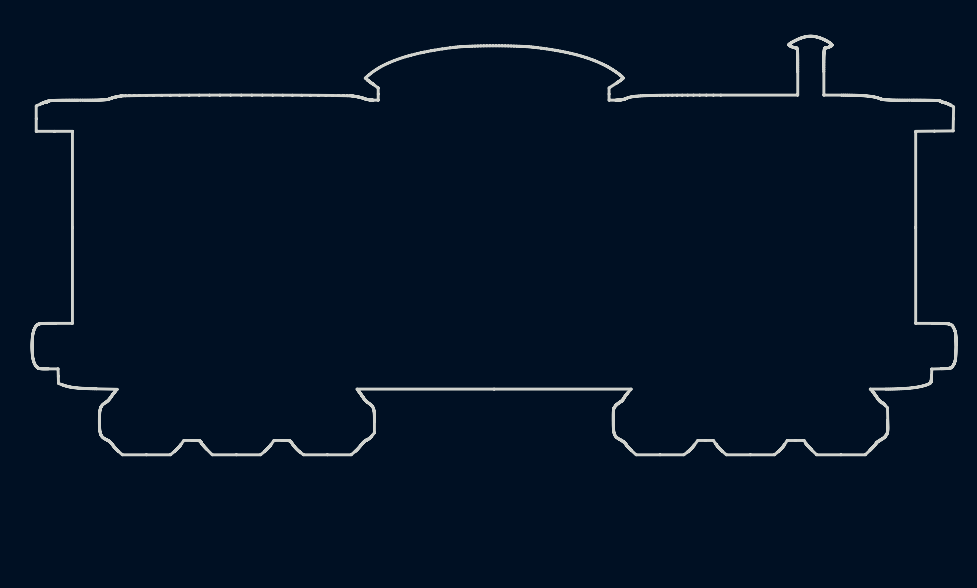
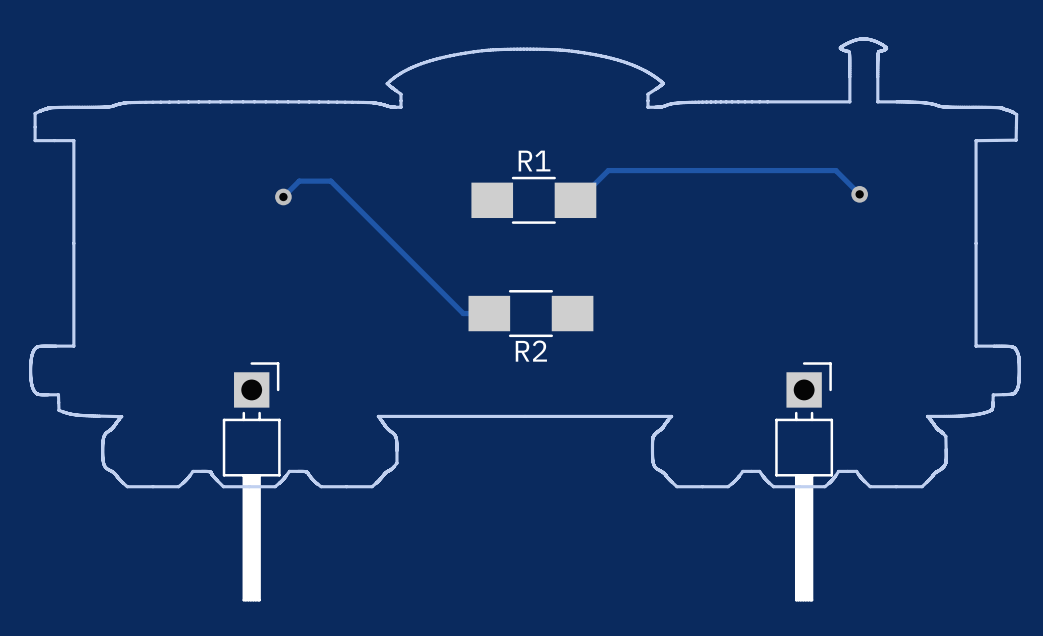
track: none -> (859, 194) (835, 170) (608, 170) (578, 200) (575, 200)
via: none -> (859, 194)
track: none -> (283, 196) (299, 181) (330, 181) (463, 313) (489, 313)
via: none -> (283, 196)
R1: none -> (533, 200)
R2: none -> (530, 313)
part: none -> (251, 481)
part: none -> (804, 481)

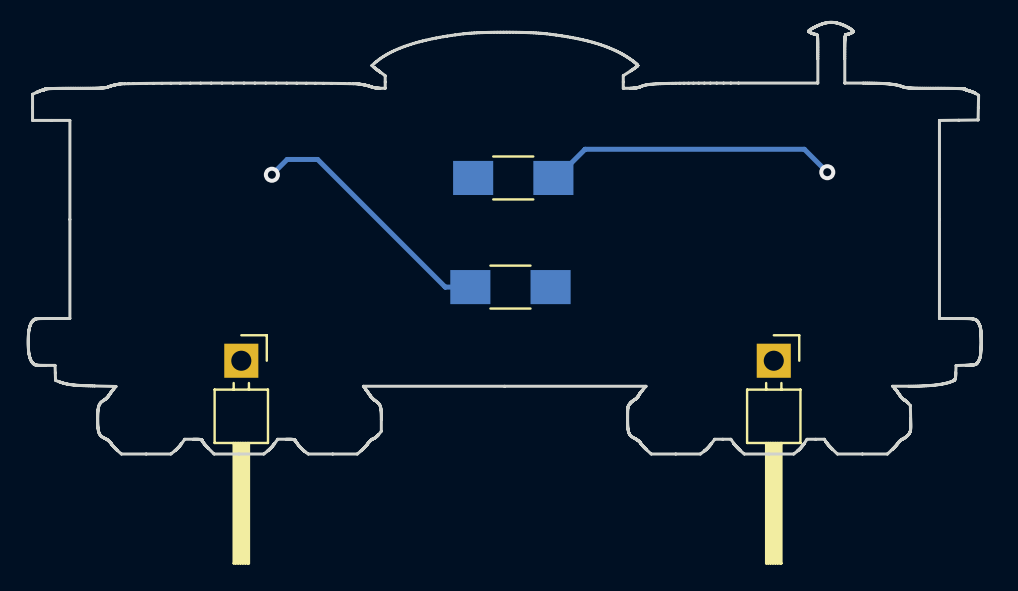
R1 name: R1 (534, 161) -> none
R2 name: R2 (531, 351) -> none

